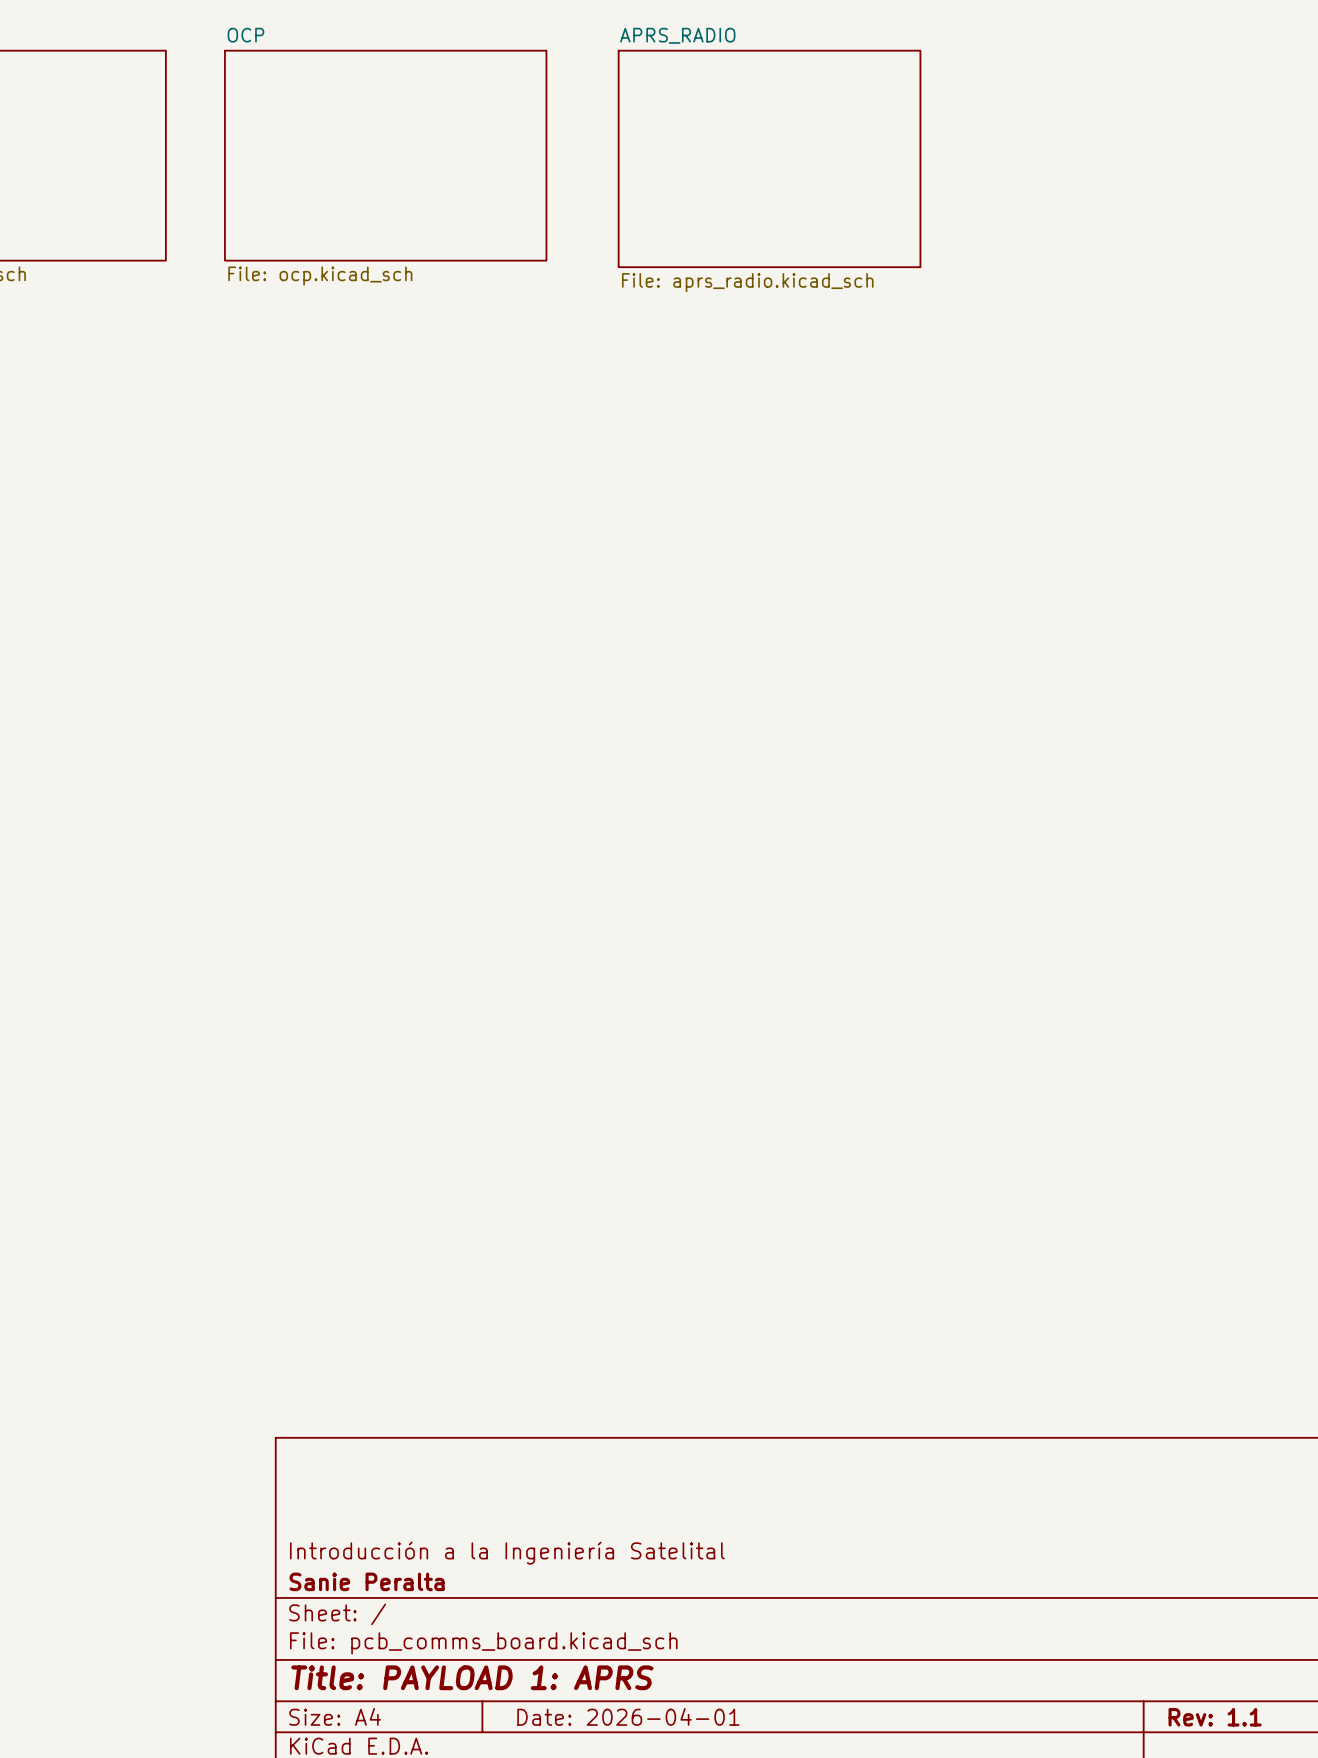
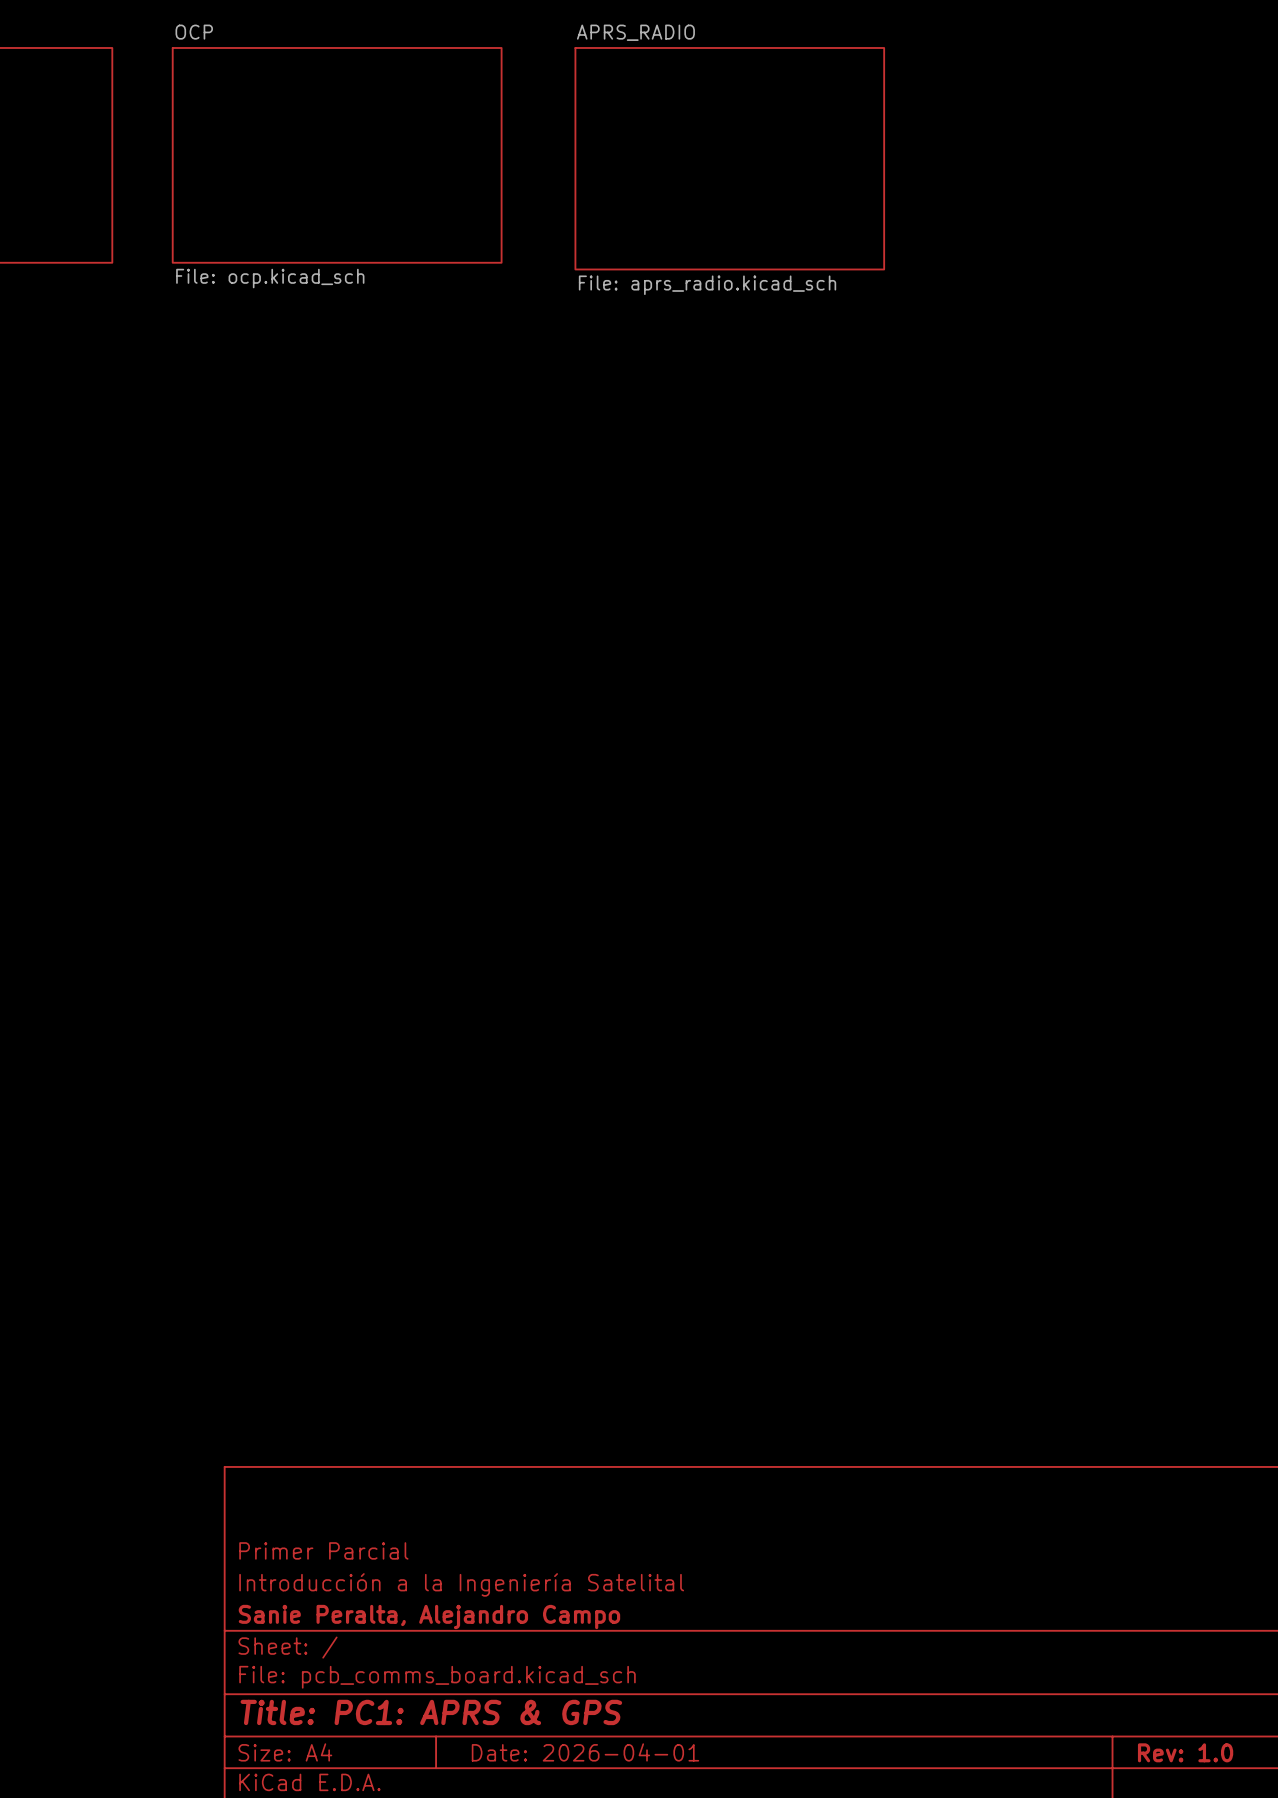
title block: none -> Primer Parcial (323, 1550)
title block: Sanie Peralta (367, 1581) -> Sanie Peralta, Alejandro Campo (429, 1616)
title block: Title: PAYLOAD 1: APRS (472, 1677) -> Title: PC1: APRS & GPS (431, 1712)
title block: Rev: 1.1 (1215, 1717) -> Rev: 1.0 (1185, 1752)

